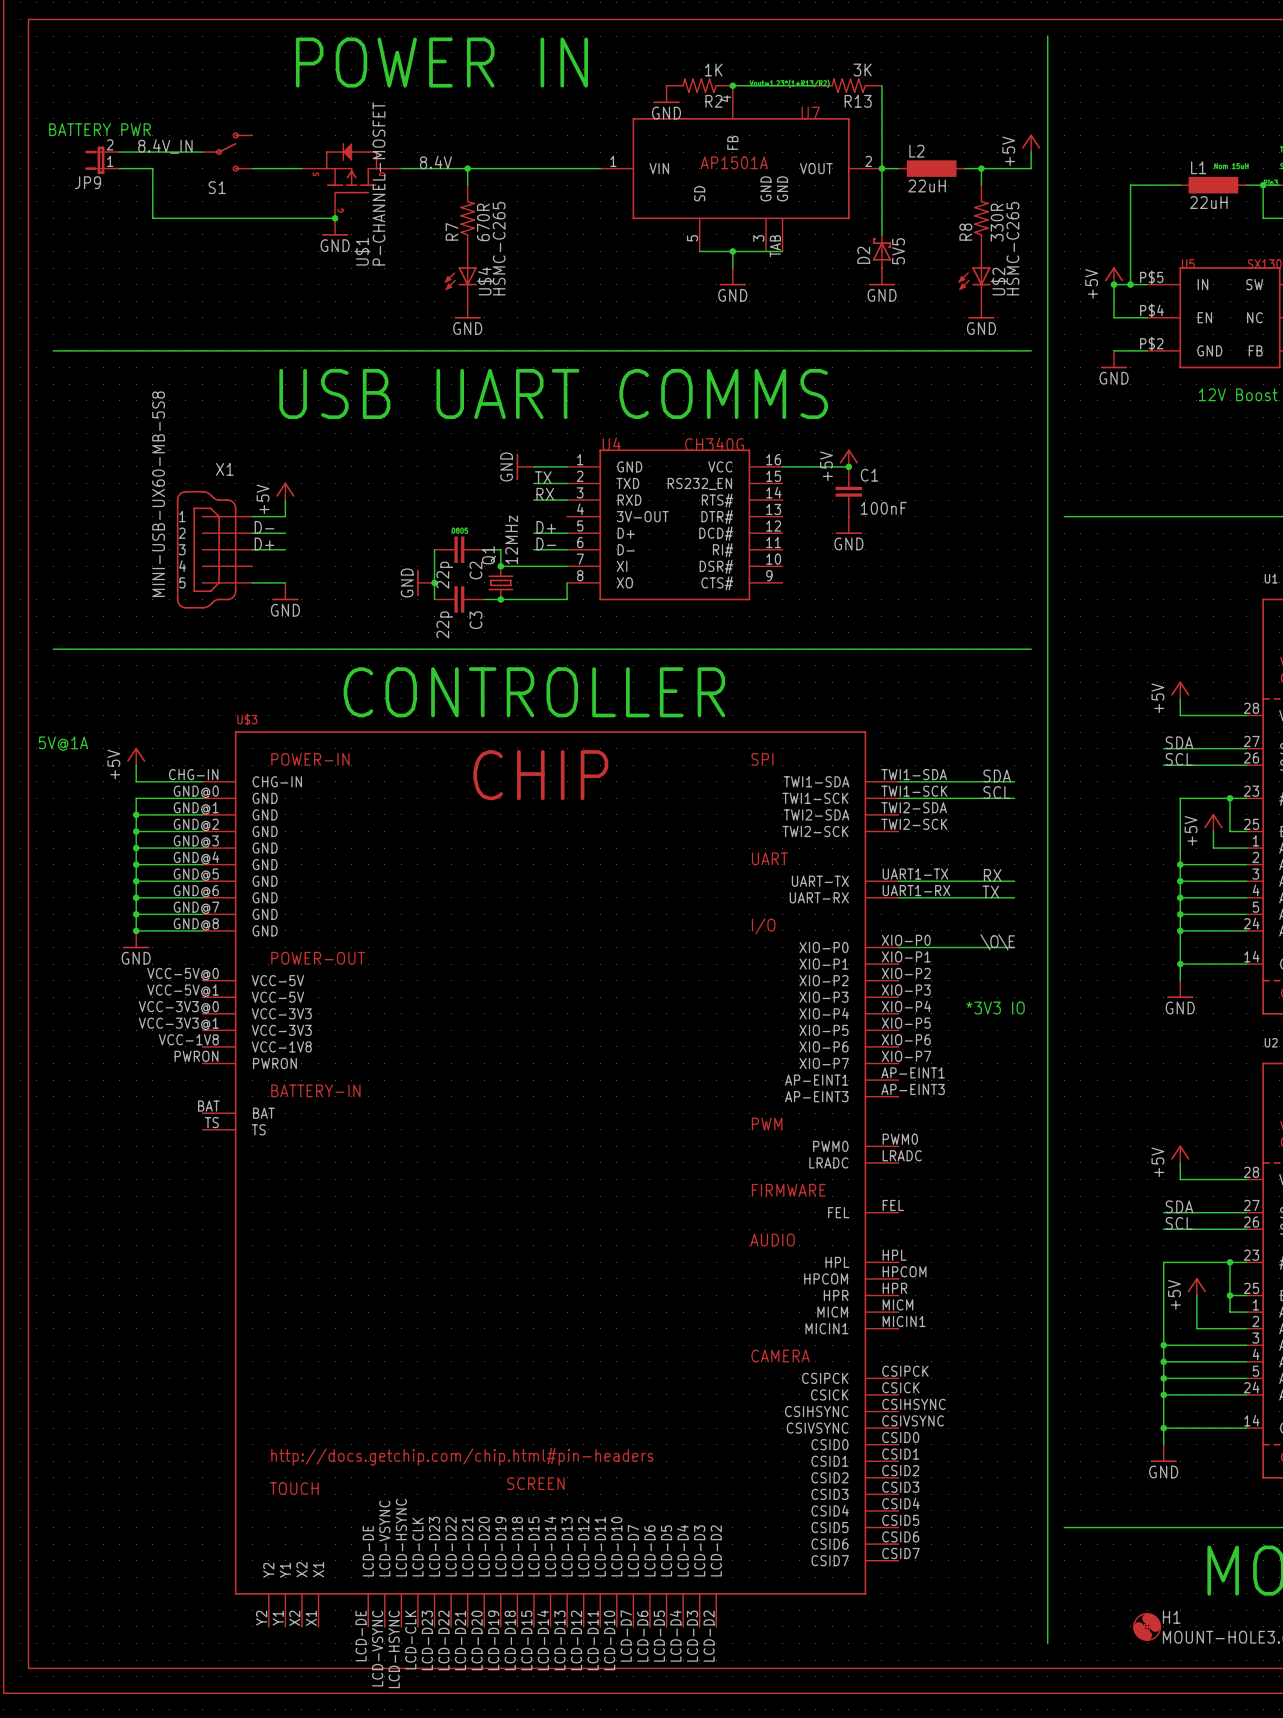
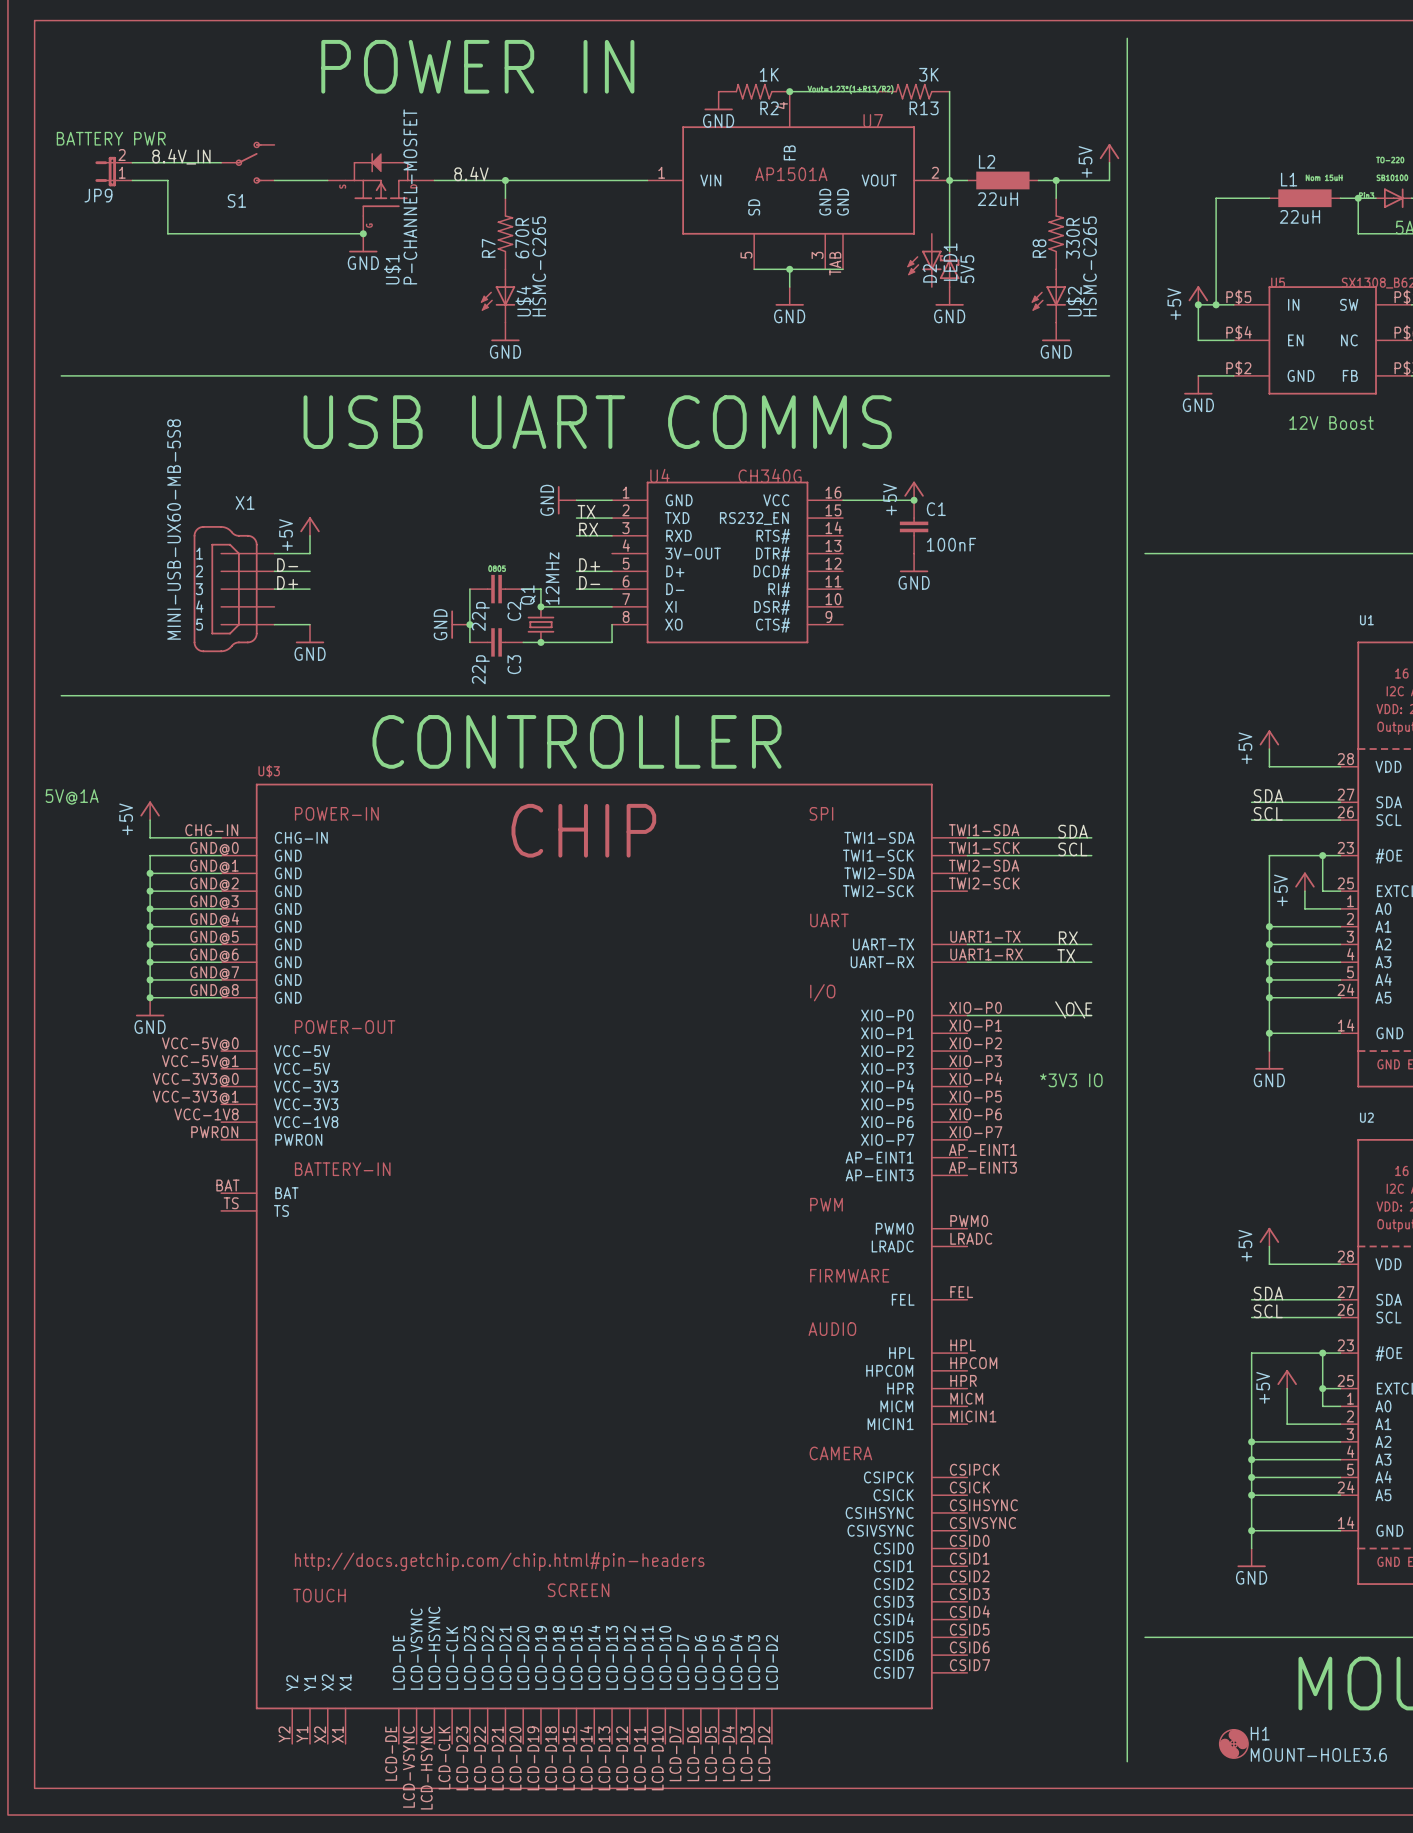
LED1: none -> (924, 260)

